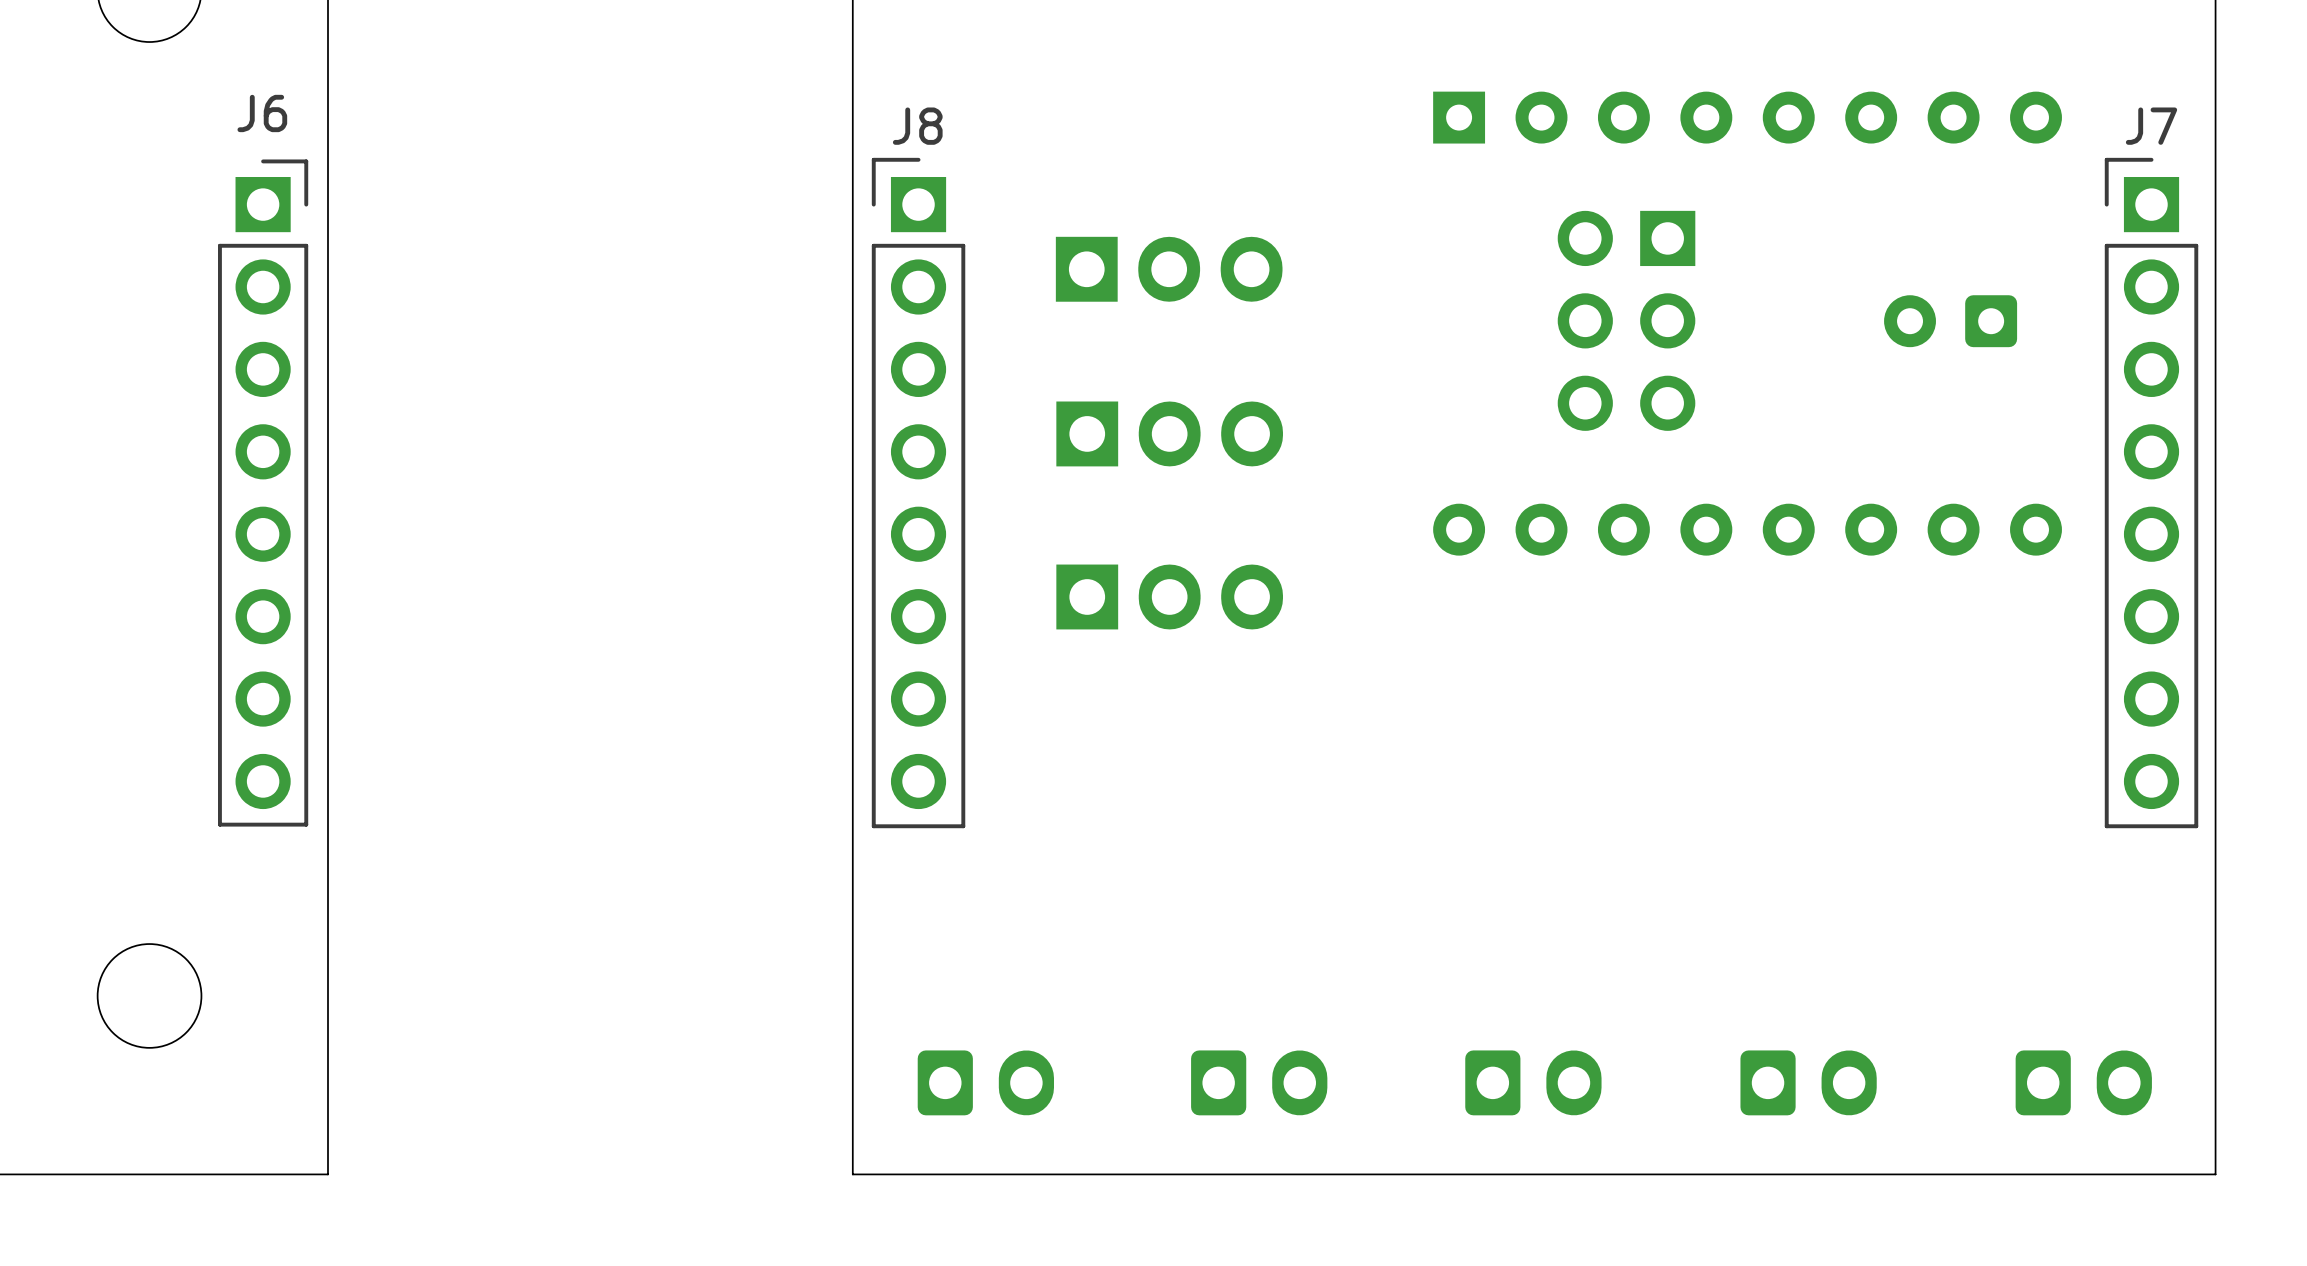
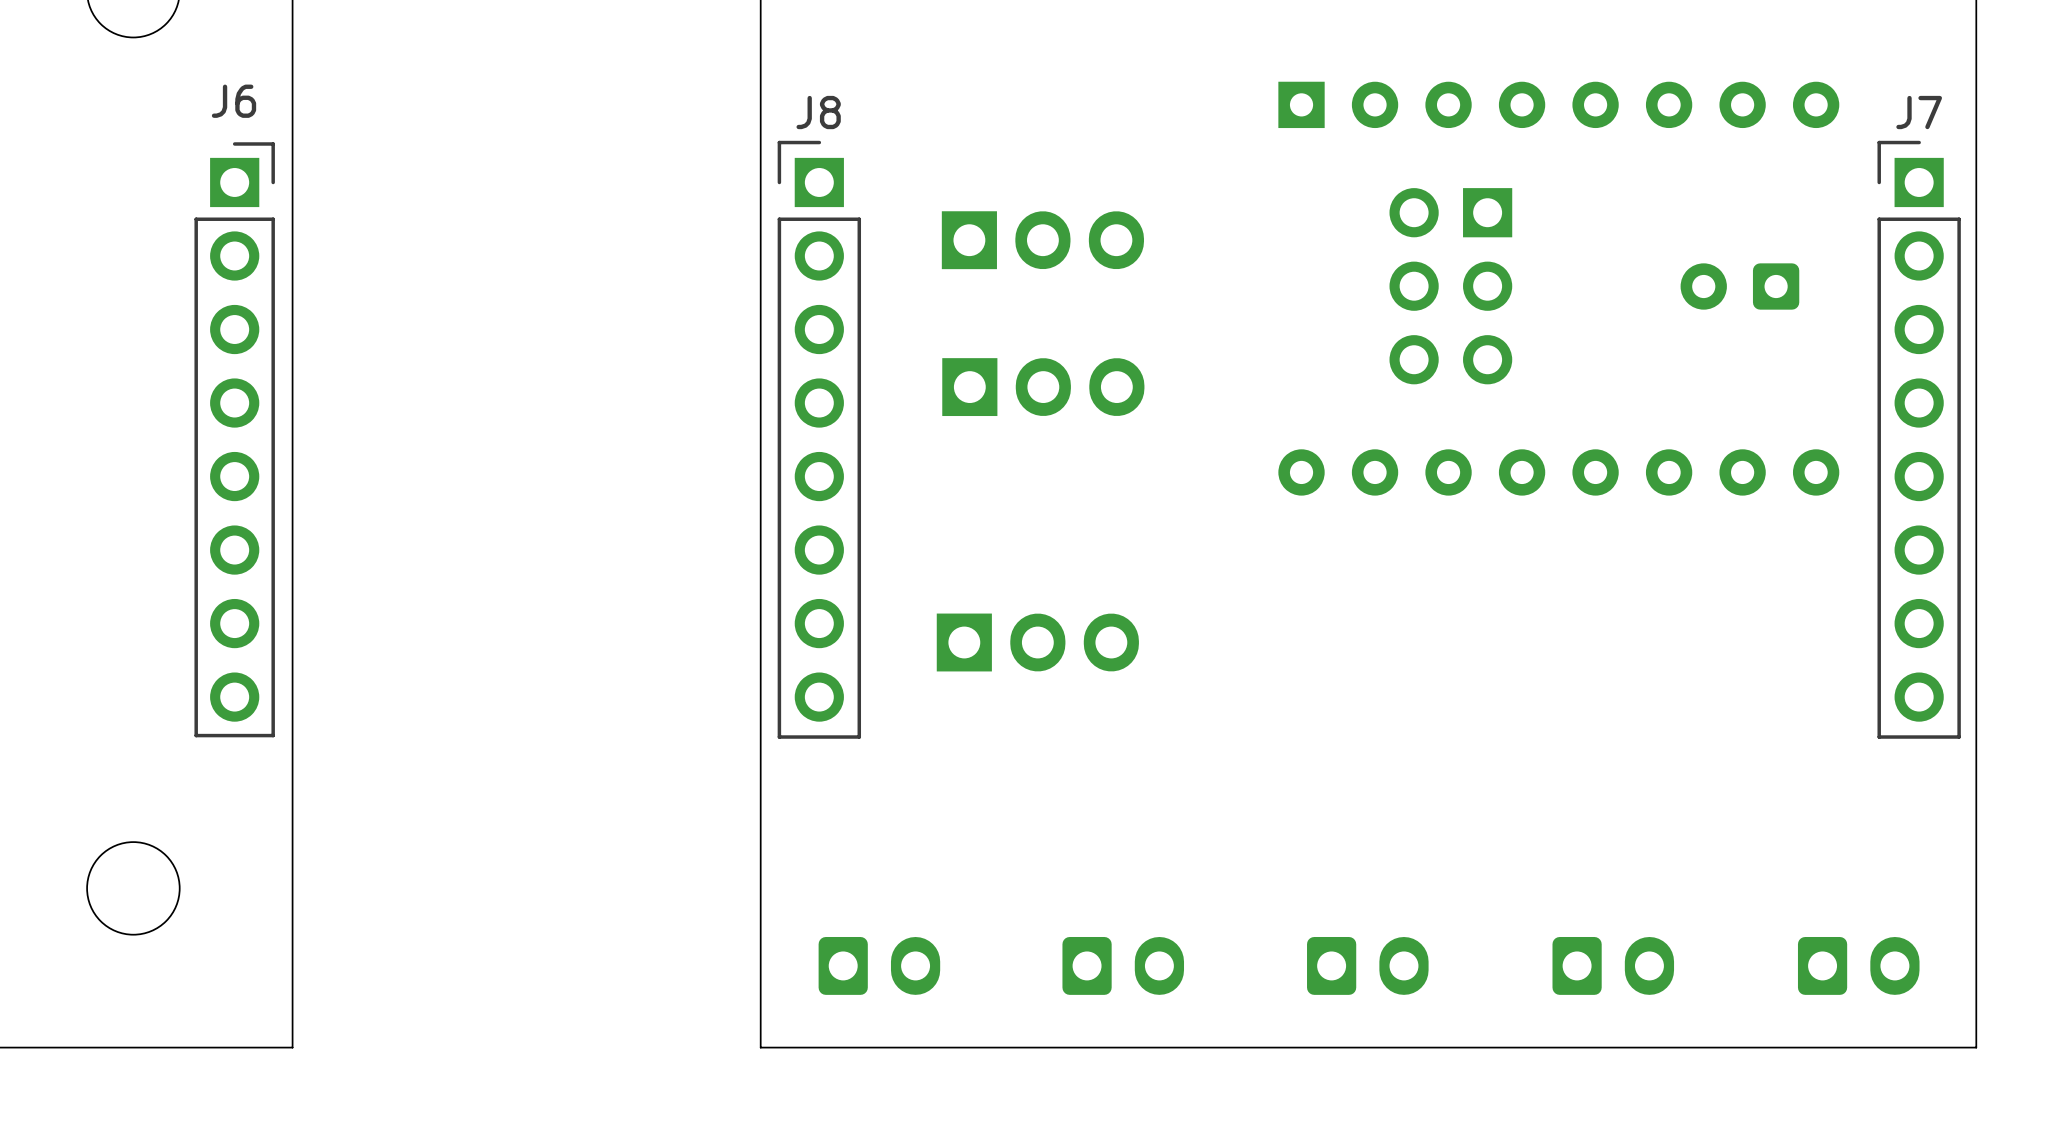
part position: (1169, 596) -> (1037, 642)

